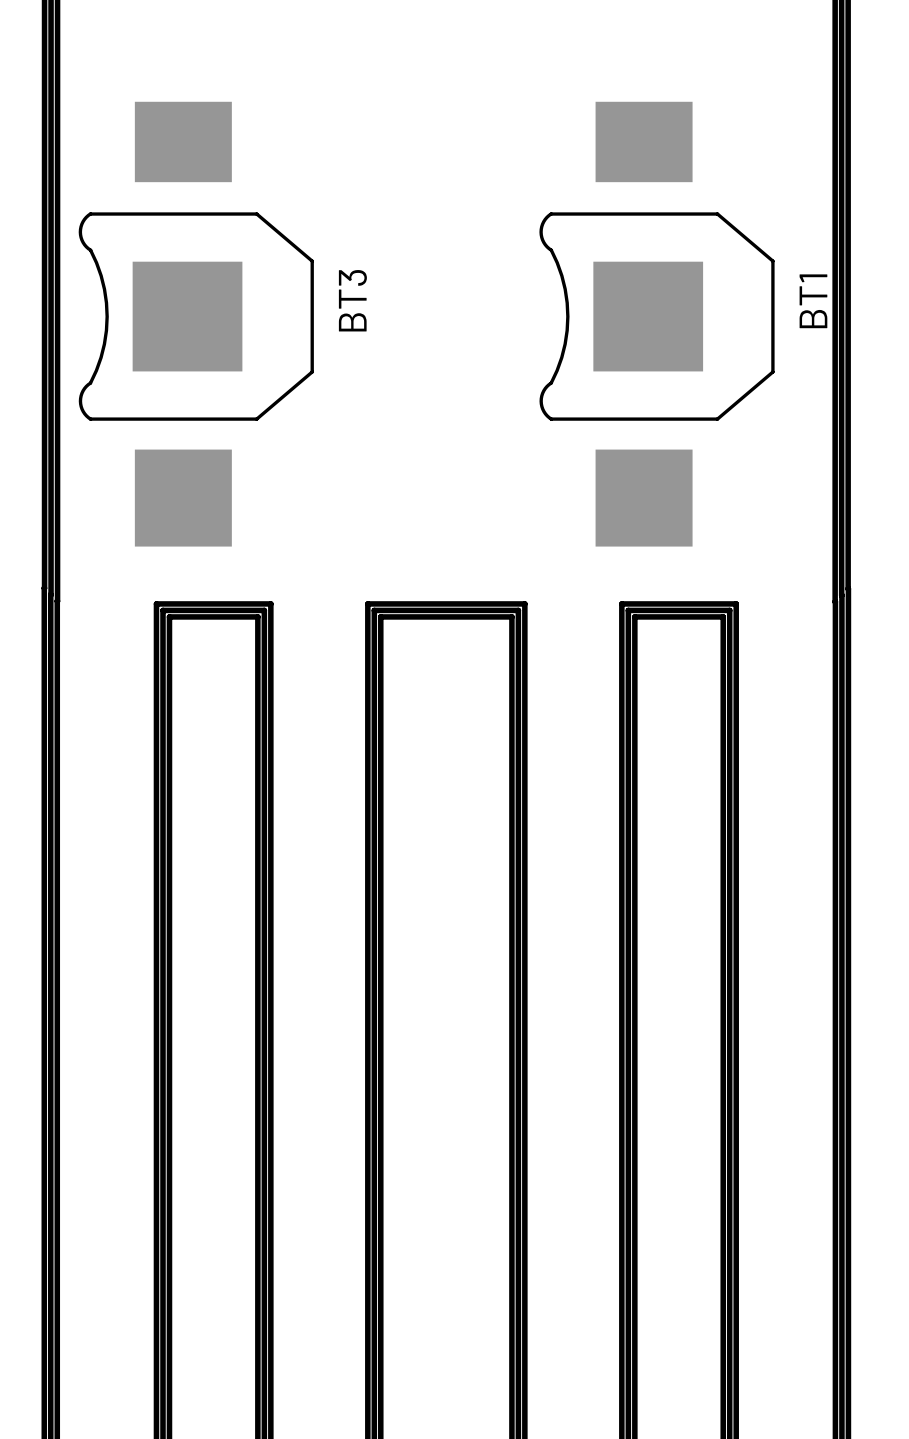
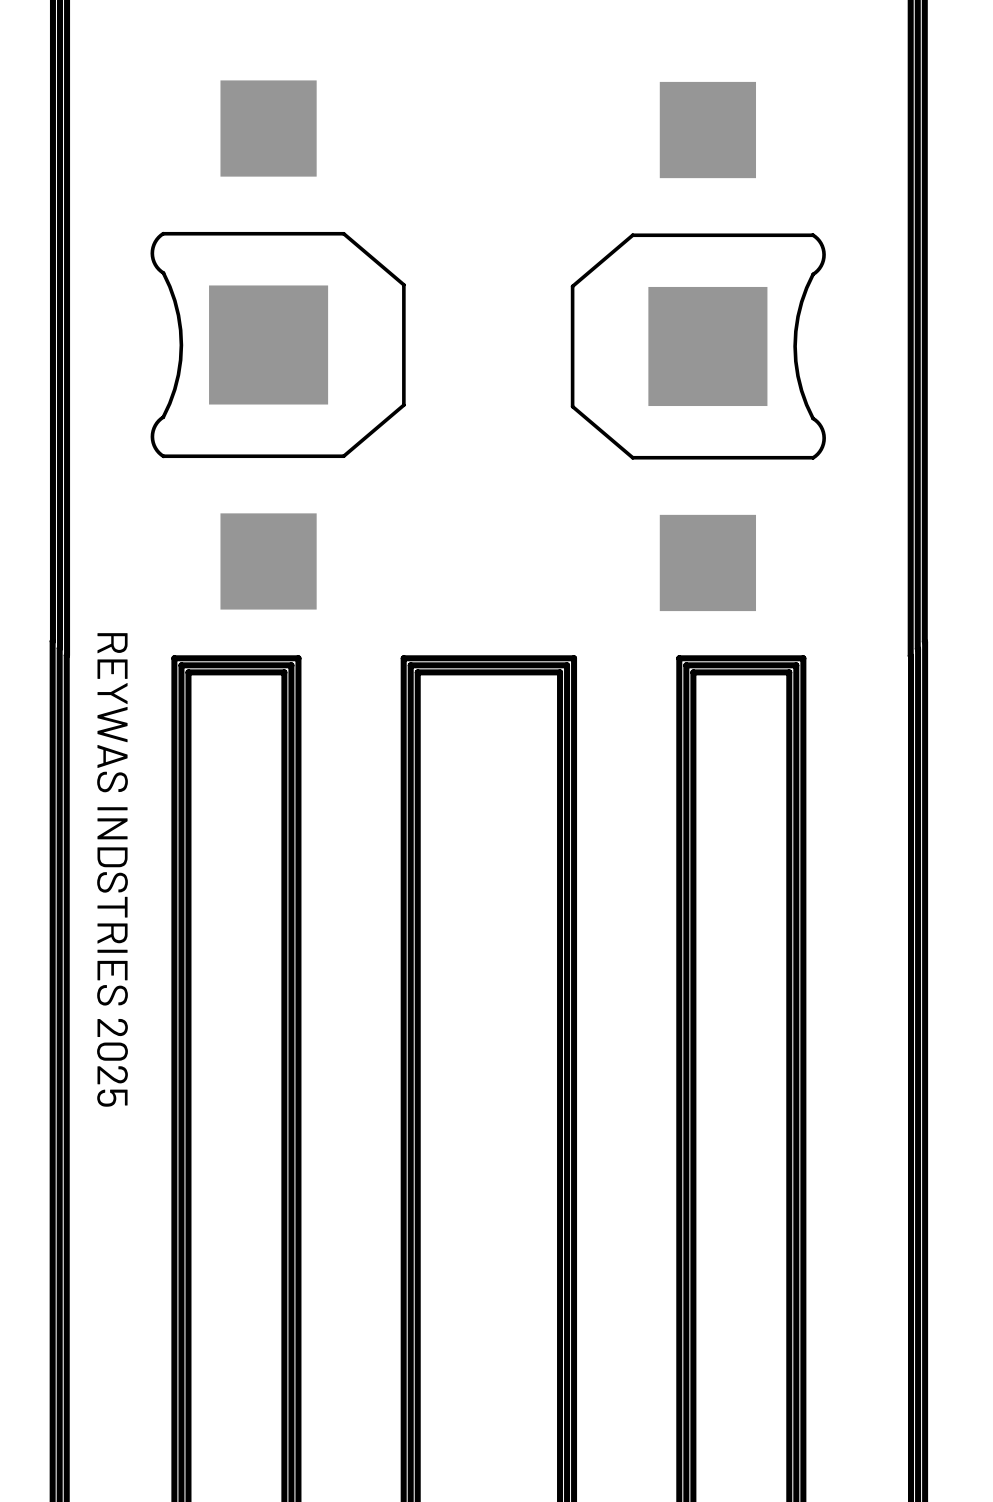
part: none -> (278, 344)
part: none -> (698, 346)
BT3: (196, 324) -> none
BT1: (657, 324) -> none
text: none -> REYWAS INDSTRIES 2025 (112, 869)

